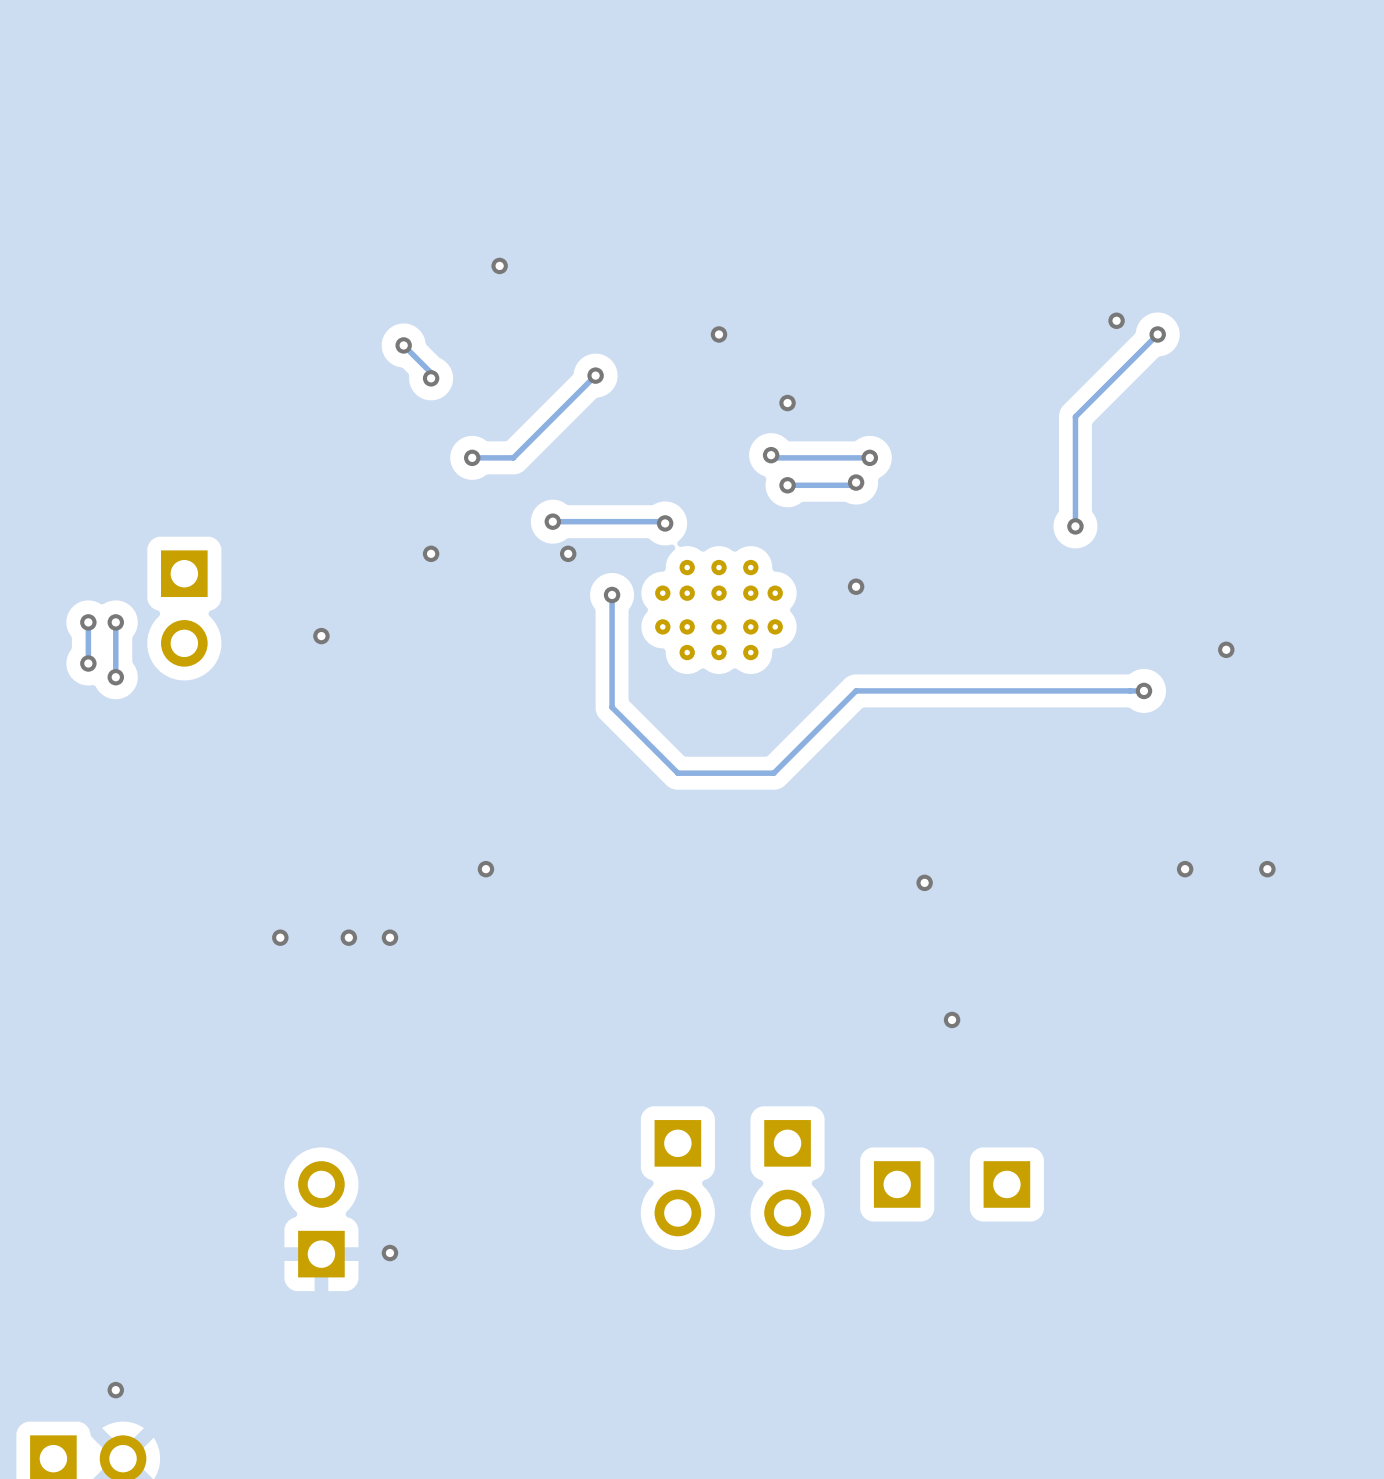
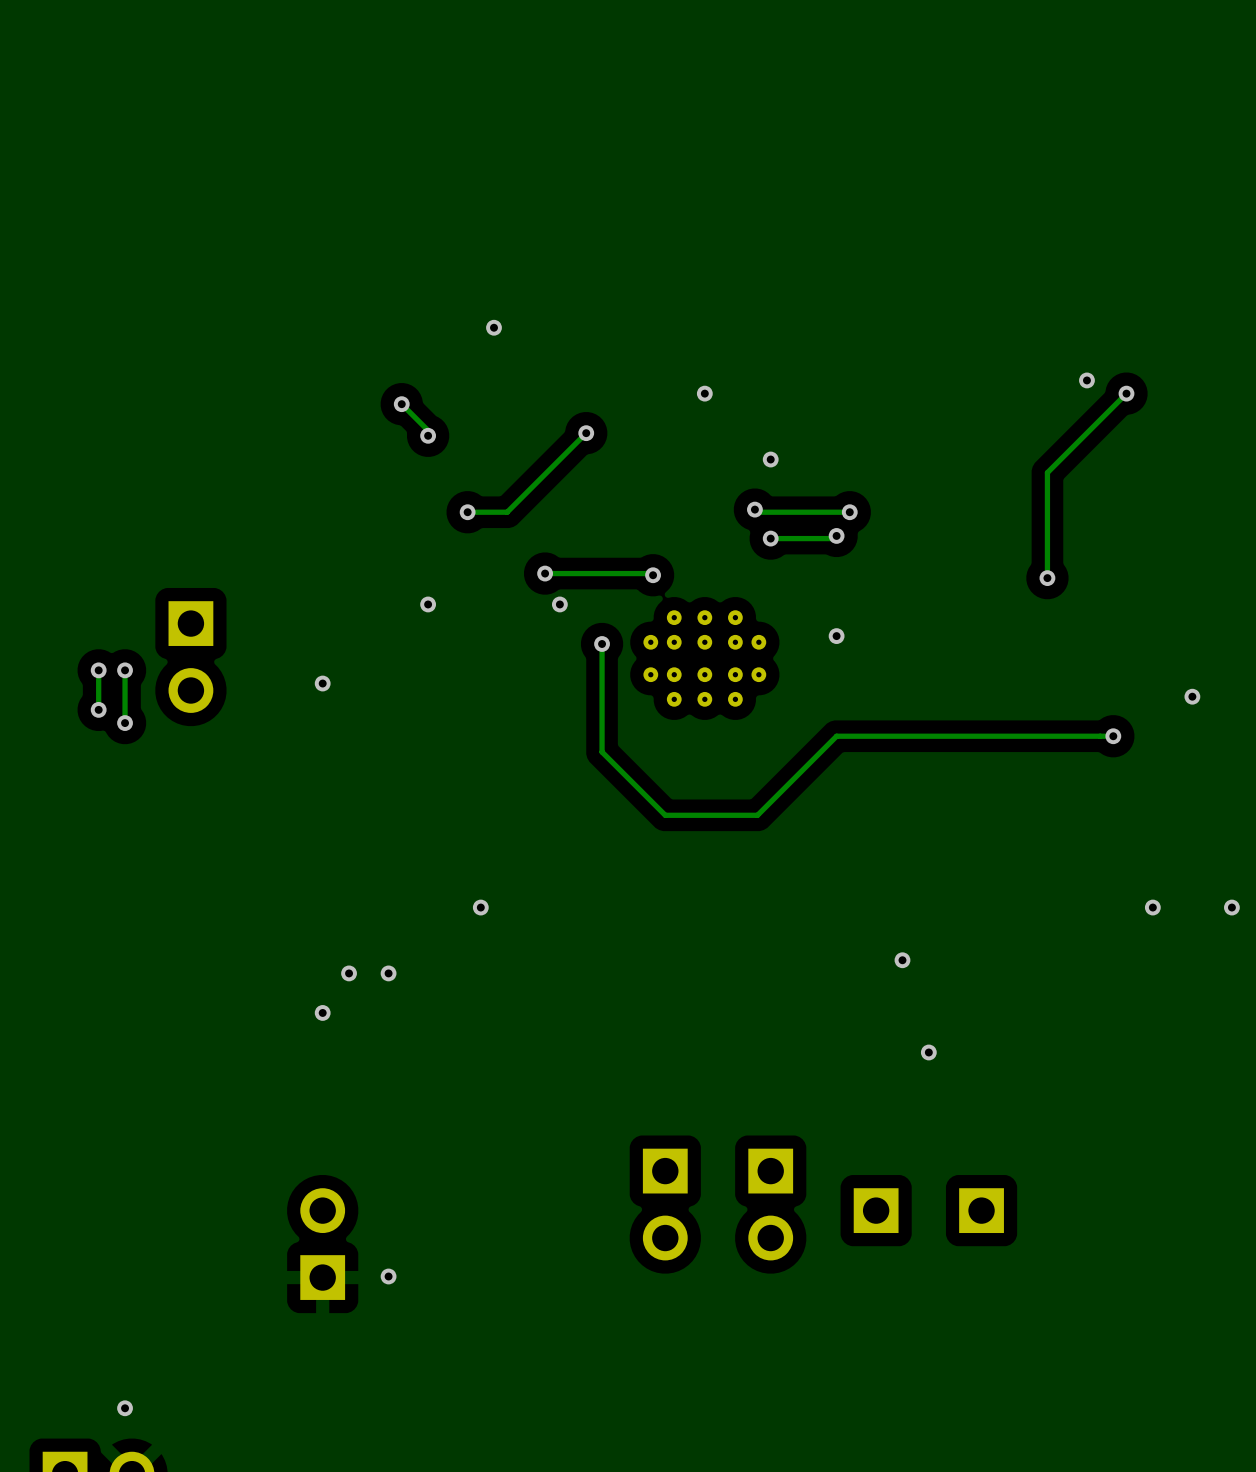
via position: (924, 882) -> (902, 960)
via position: (280, 937) -> (322, 1012)

